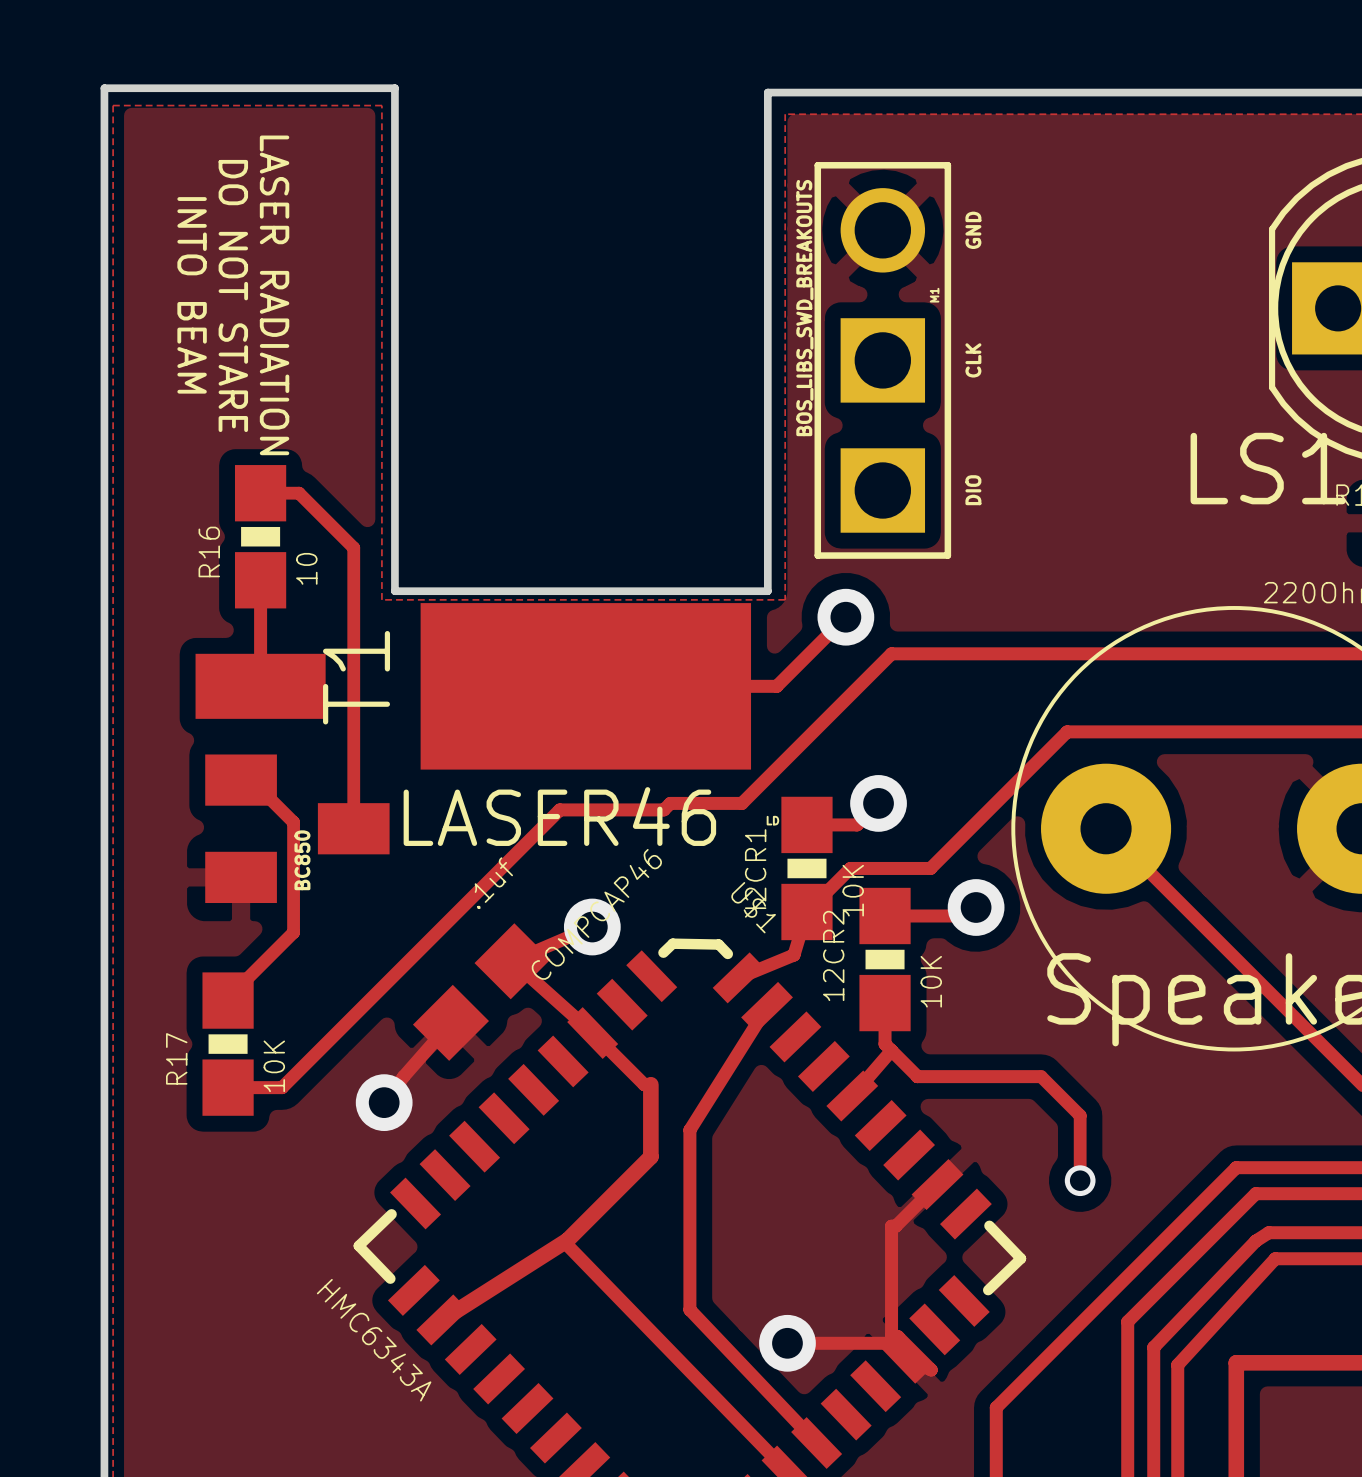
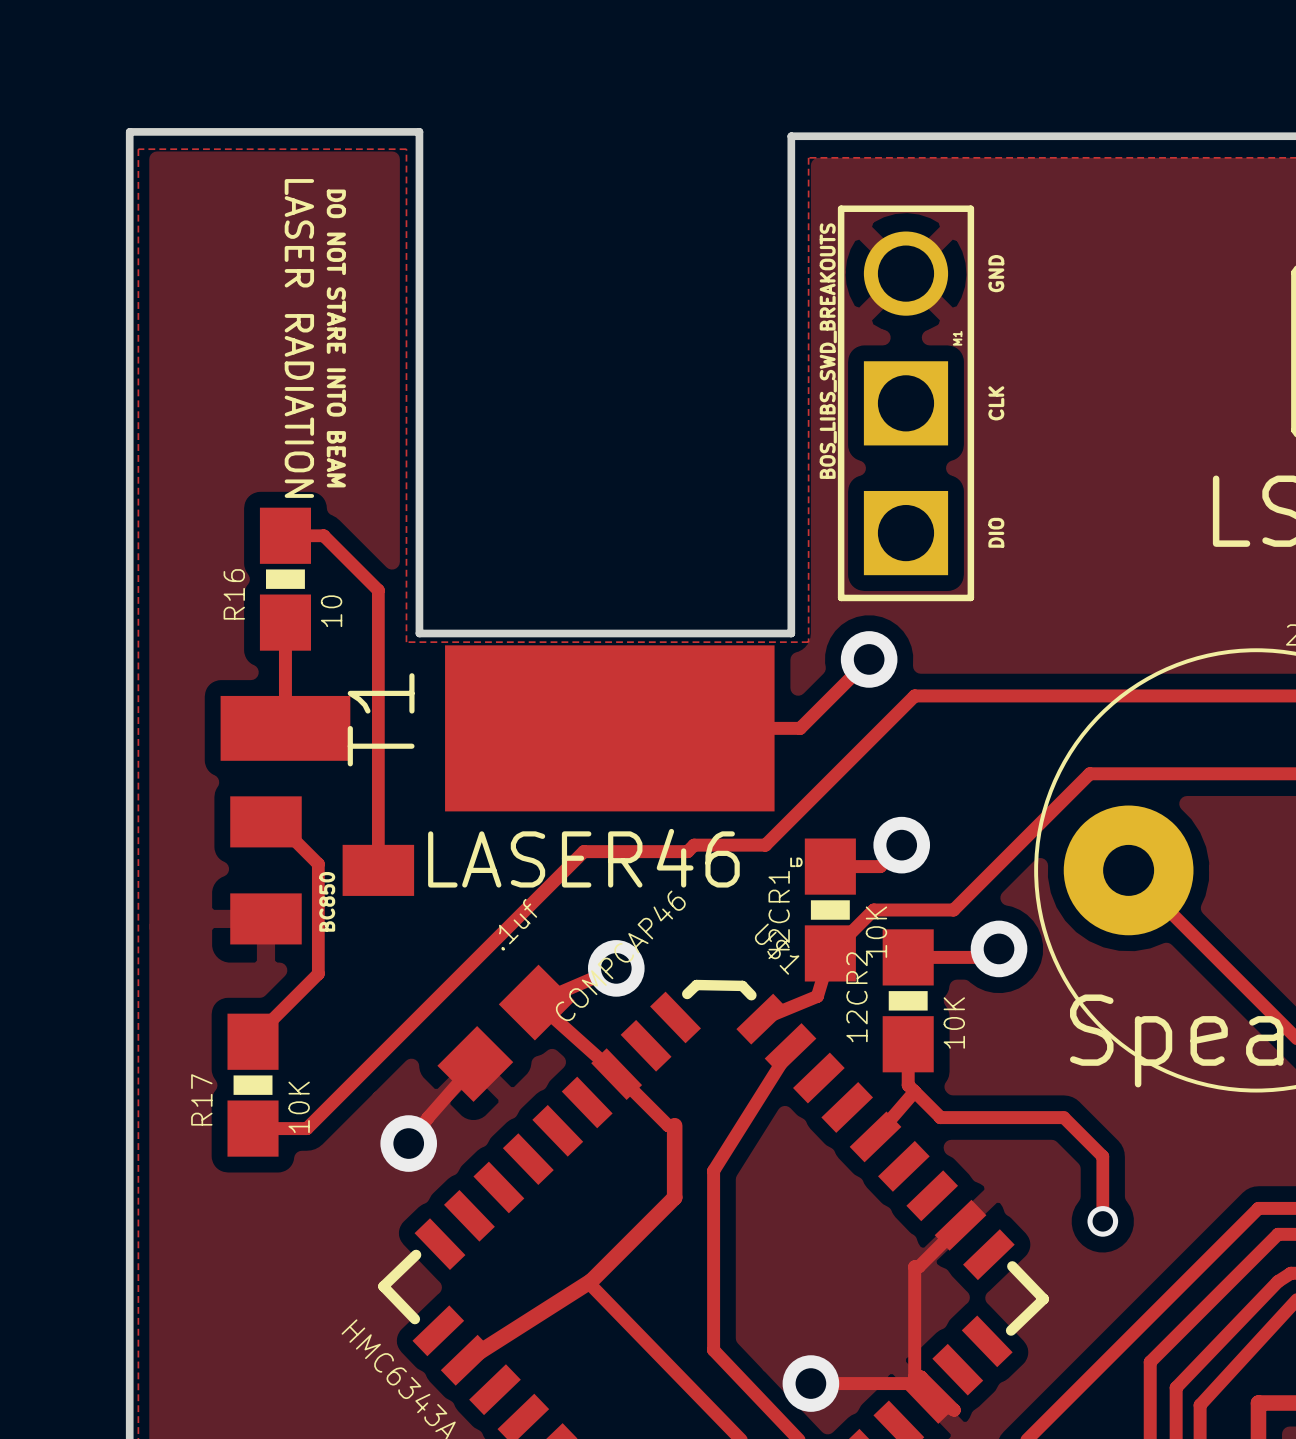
text: INTO BEAM (192, 295) -> none
text: DO NOT STARE (233, 295) -> none
text: none -> DO NOT STARE INTO BEAM (336, 338)

